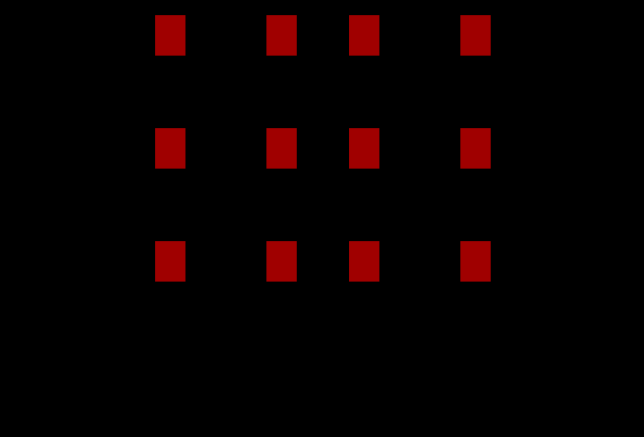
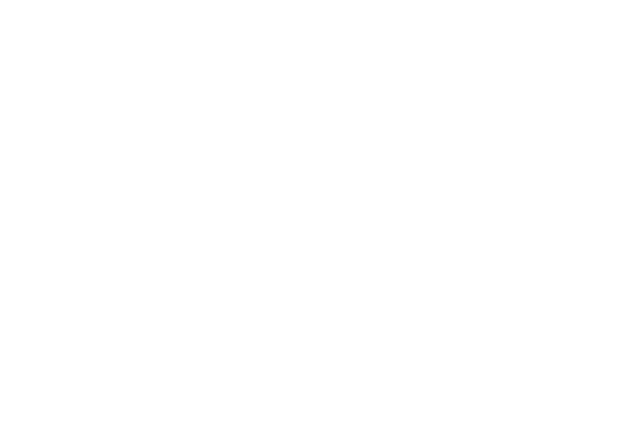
part: (225, 35) -> none
part: (419, 35) -> none
part: (225, 148) -> none
part: (419, 148) -> none
part: (225, 261) -> none
part: (419, 261) -> none

